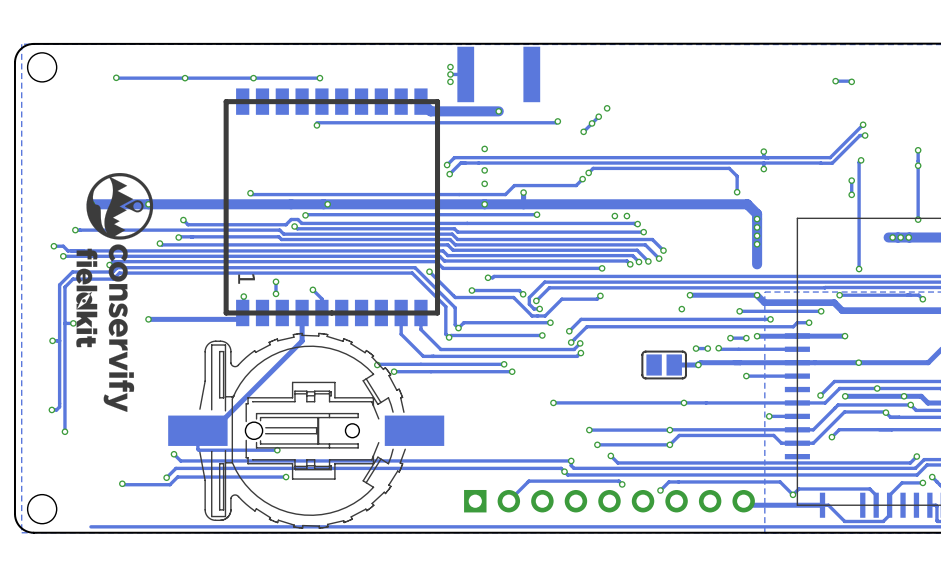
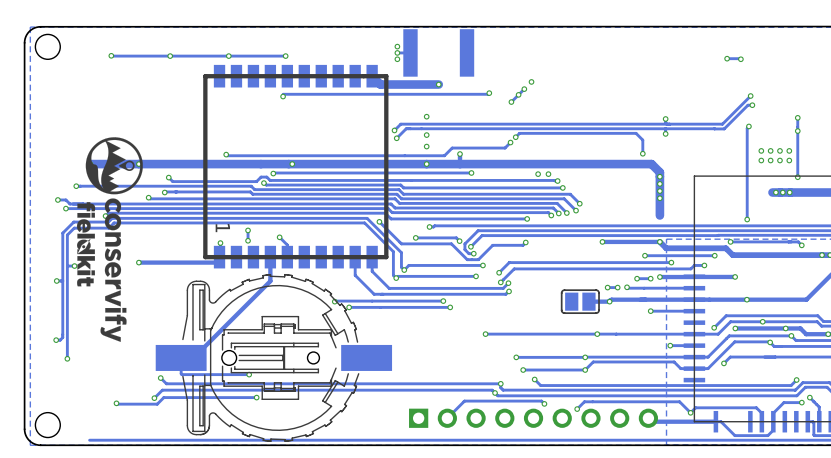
track: (851, 180) (851, 194) -> none
via: (851, 180) -> none
via: none -> (761, 150)
via: none -> (770, 150)
via: none -> (779, 150)
via: none -> (789, 150)
via: (851, 194) -> none
via: none -> (761, 160)
via: none -> (770, 160)
via: none -> (779, 160)
via: none -> (789, 160)
via: (681, 309) -> none

